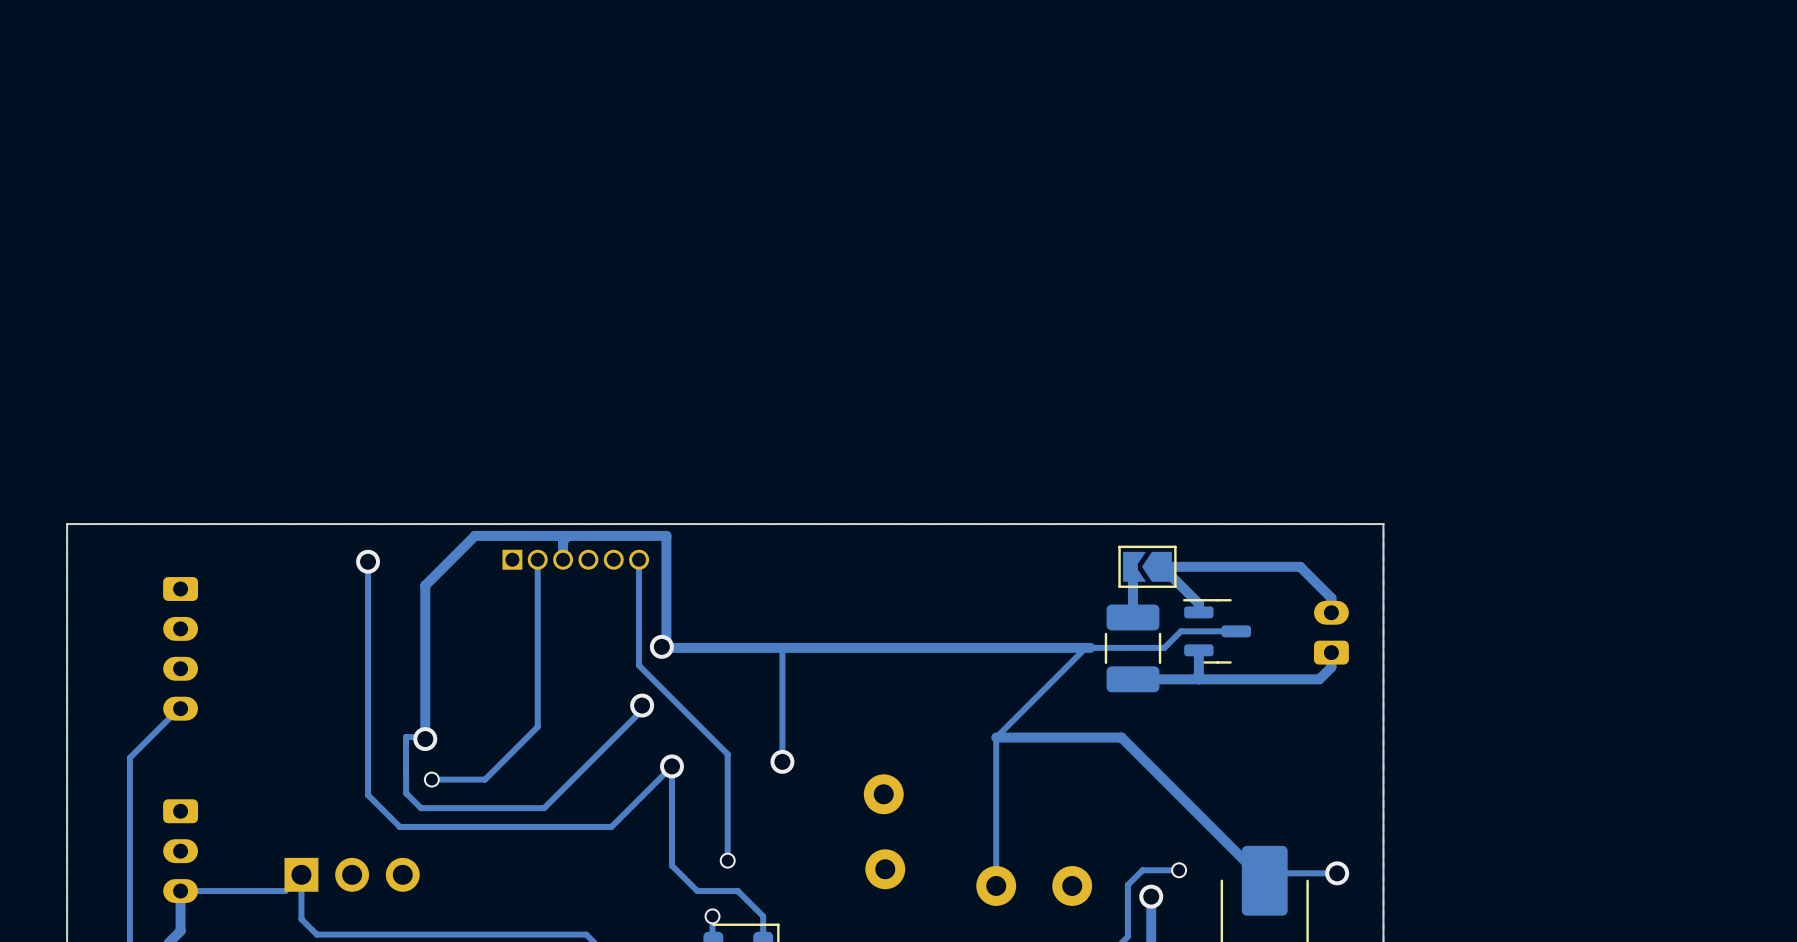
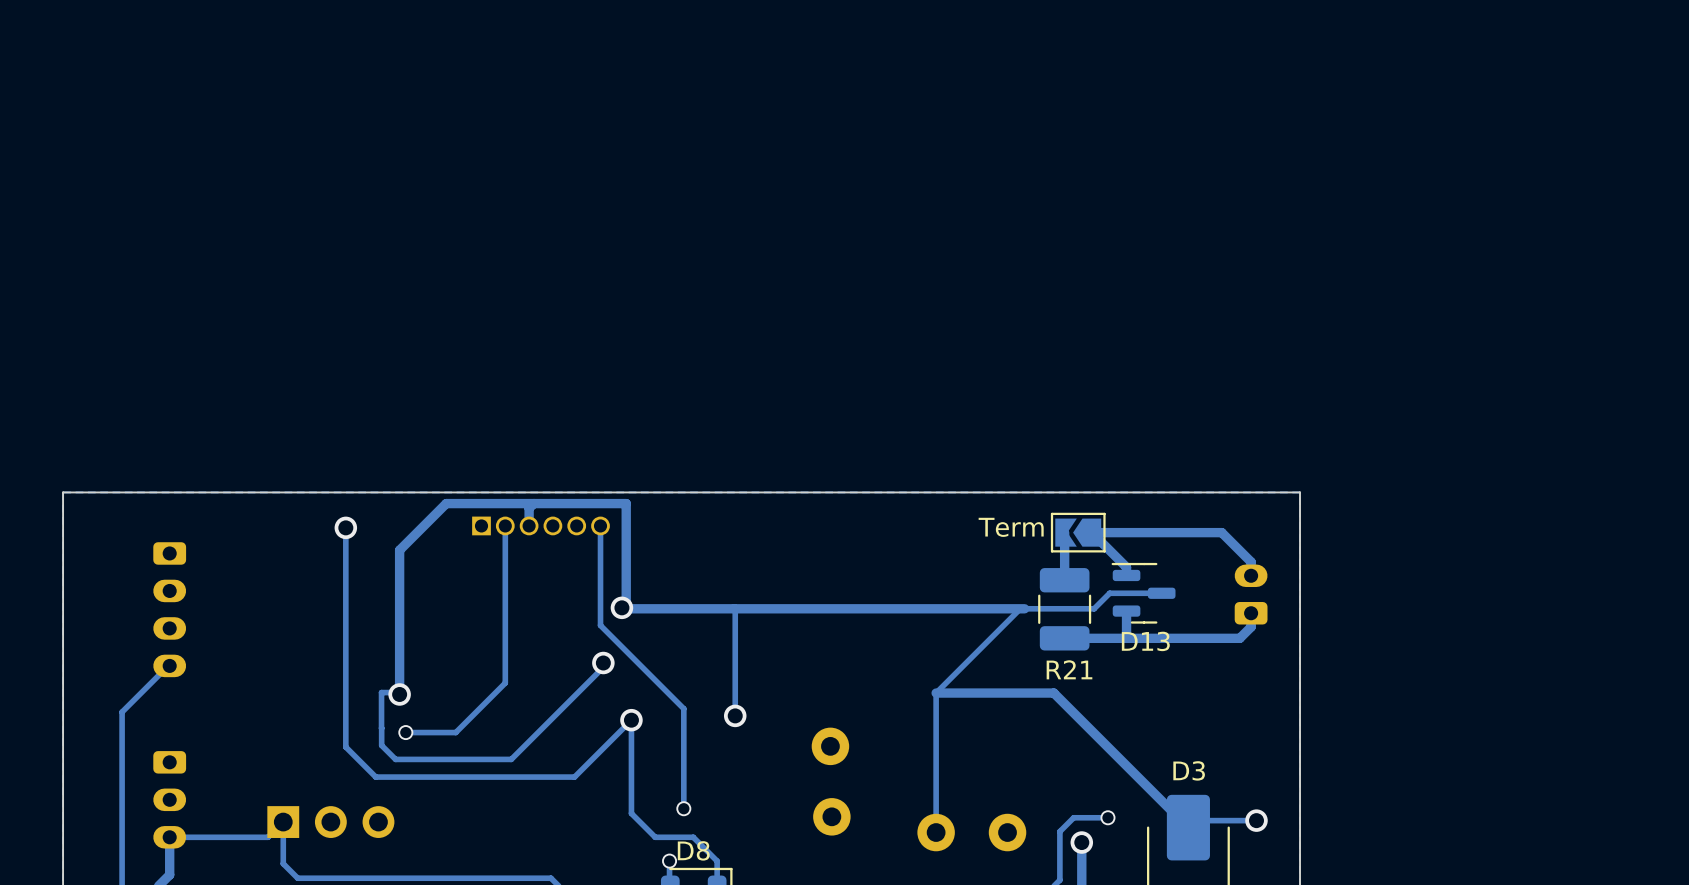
part value: none -> Term (1011, 527)
D13 name: none -> D13 (1145, 641)
R21 name: none -> R21 (1069, 669)
D3 name: none -> D3 (1189, 770)
D8 name: none -> D8 (693, 850)

